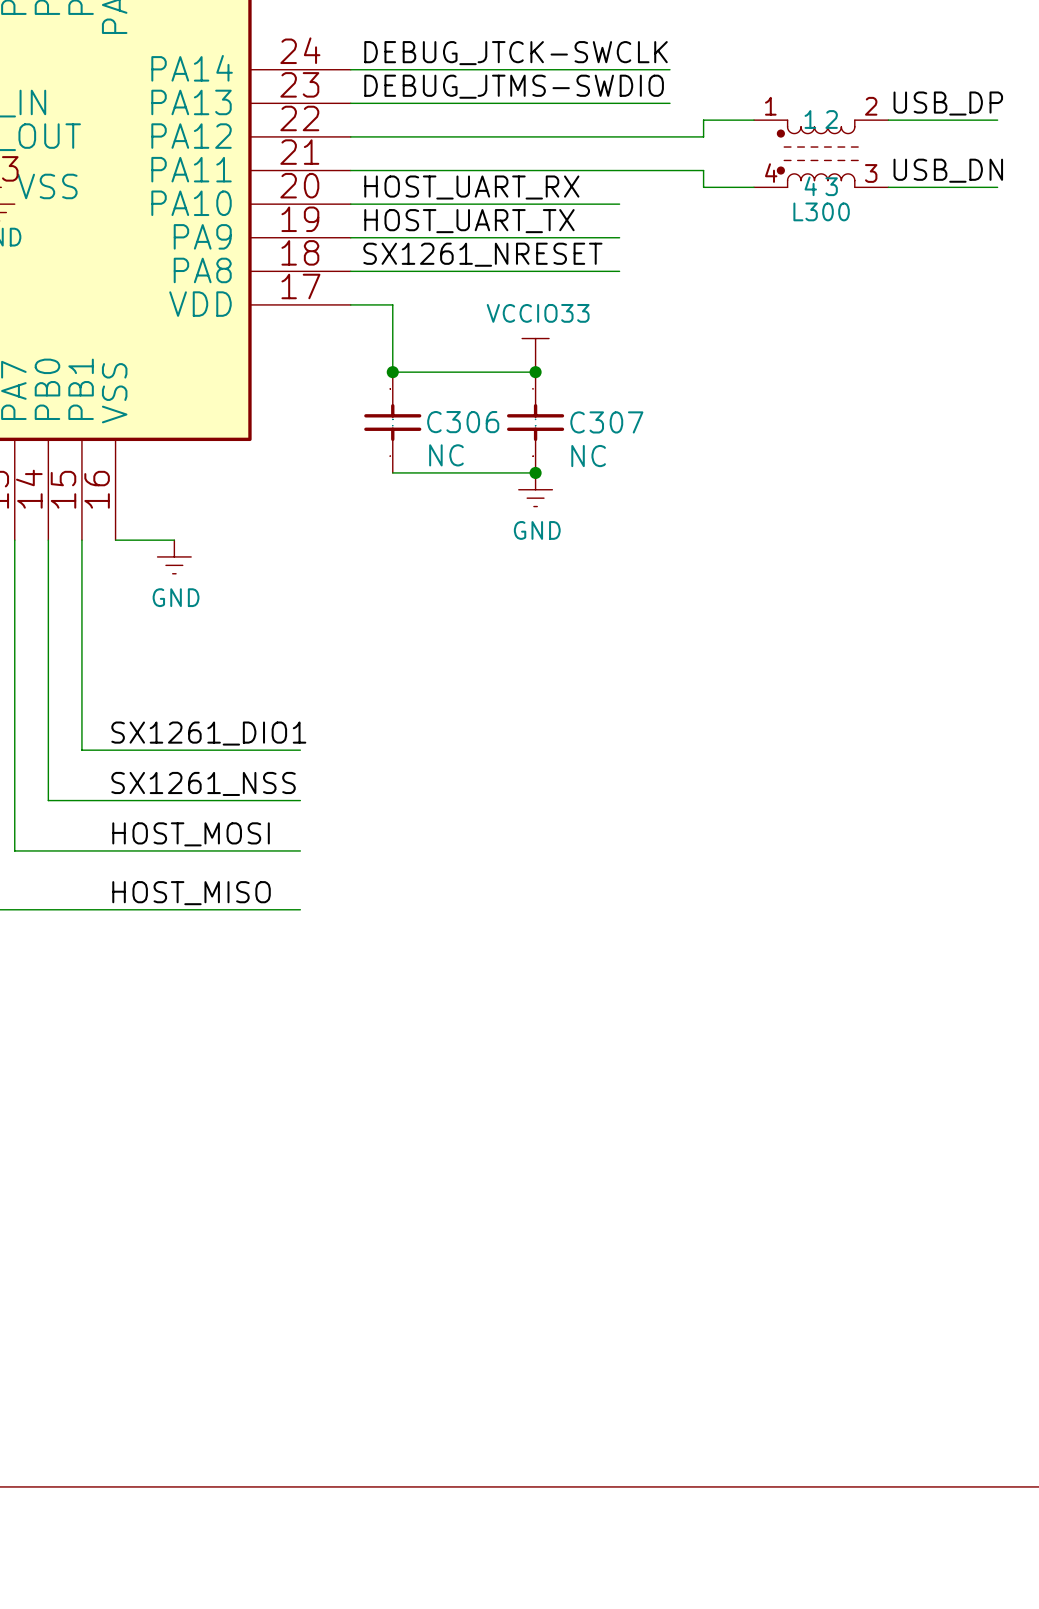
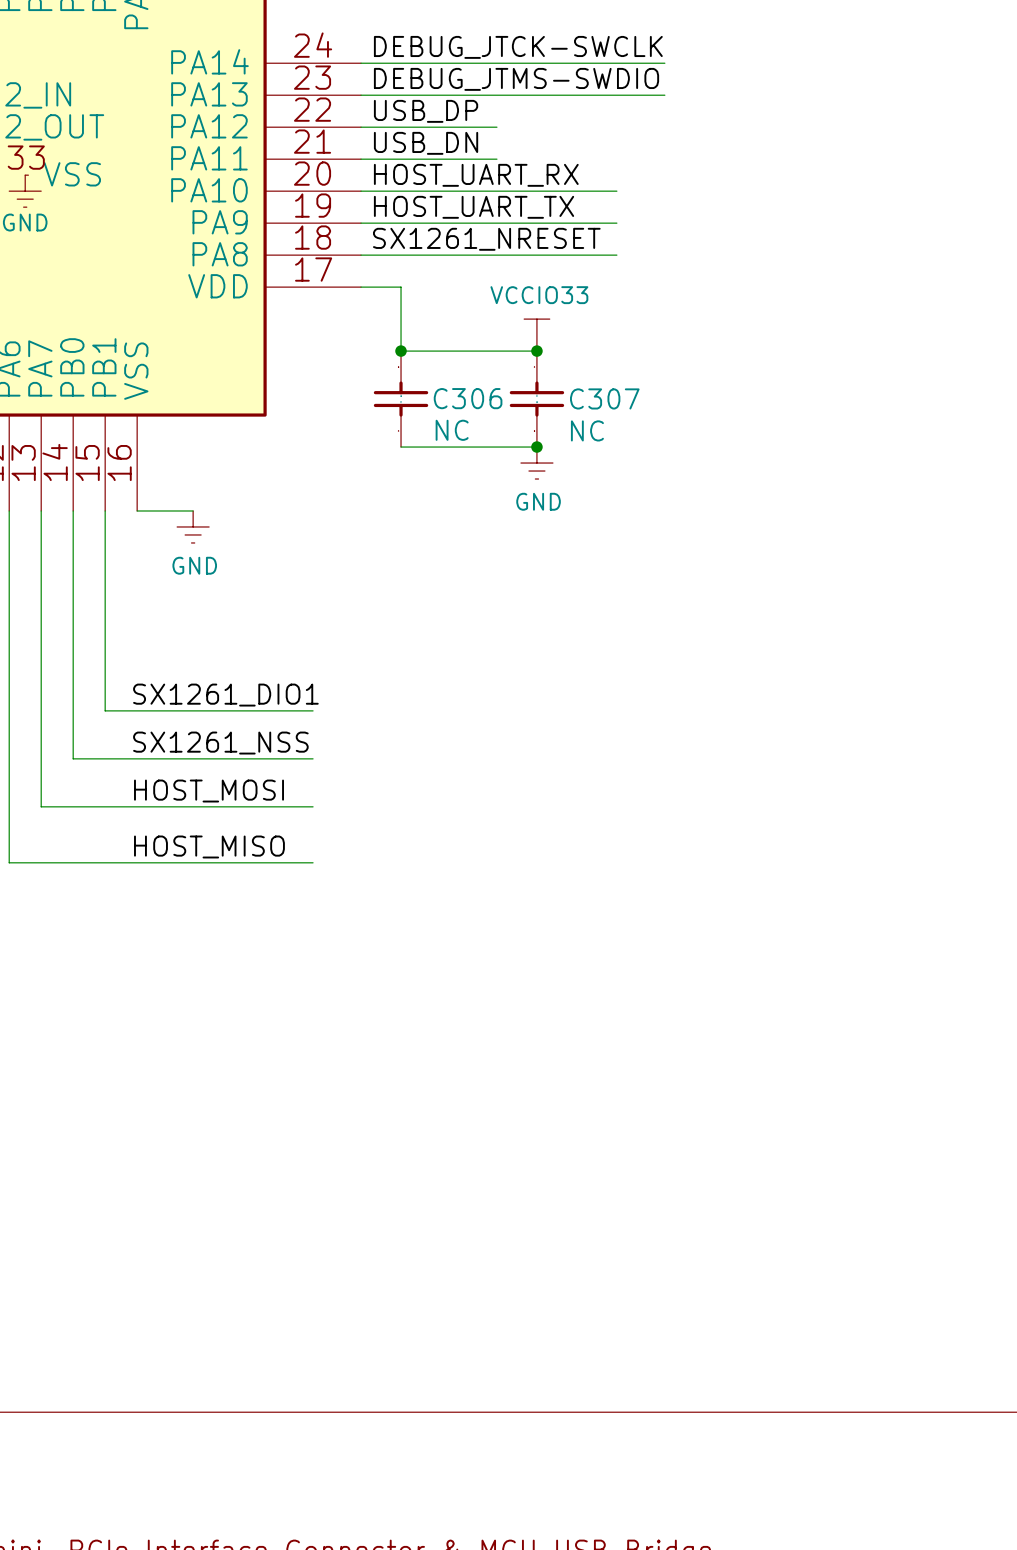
label: USB_DP (948, 103) -> none
label: none -> USB_DP (426, 111)
wire: (753, 120) (703, 120) (703, 136) (493, 136) -> none
wire: (888, 120) (997, 120) -> none
label: none -> USB_DN (426, 143)
L300: (821, 153) -> none
wire: (493, 170) (703, 170) (703, 187) (753, 187) -> none
label: USB_DN (948, 170) -> none
wire: (888, 187) (997, 187) -> none

